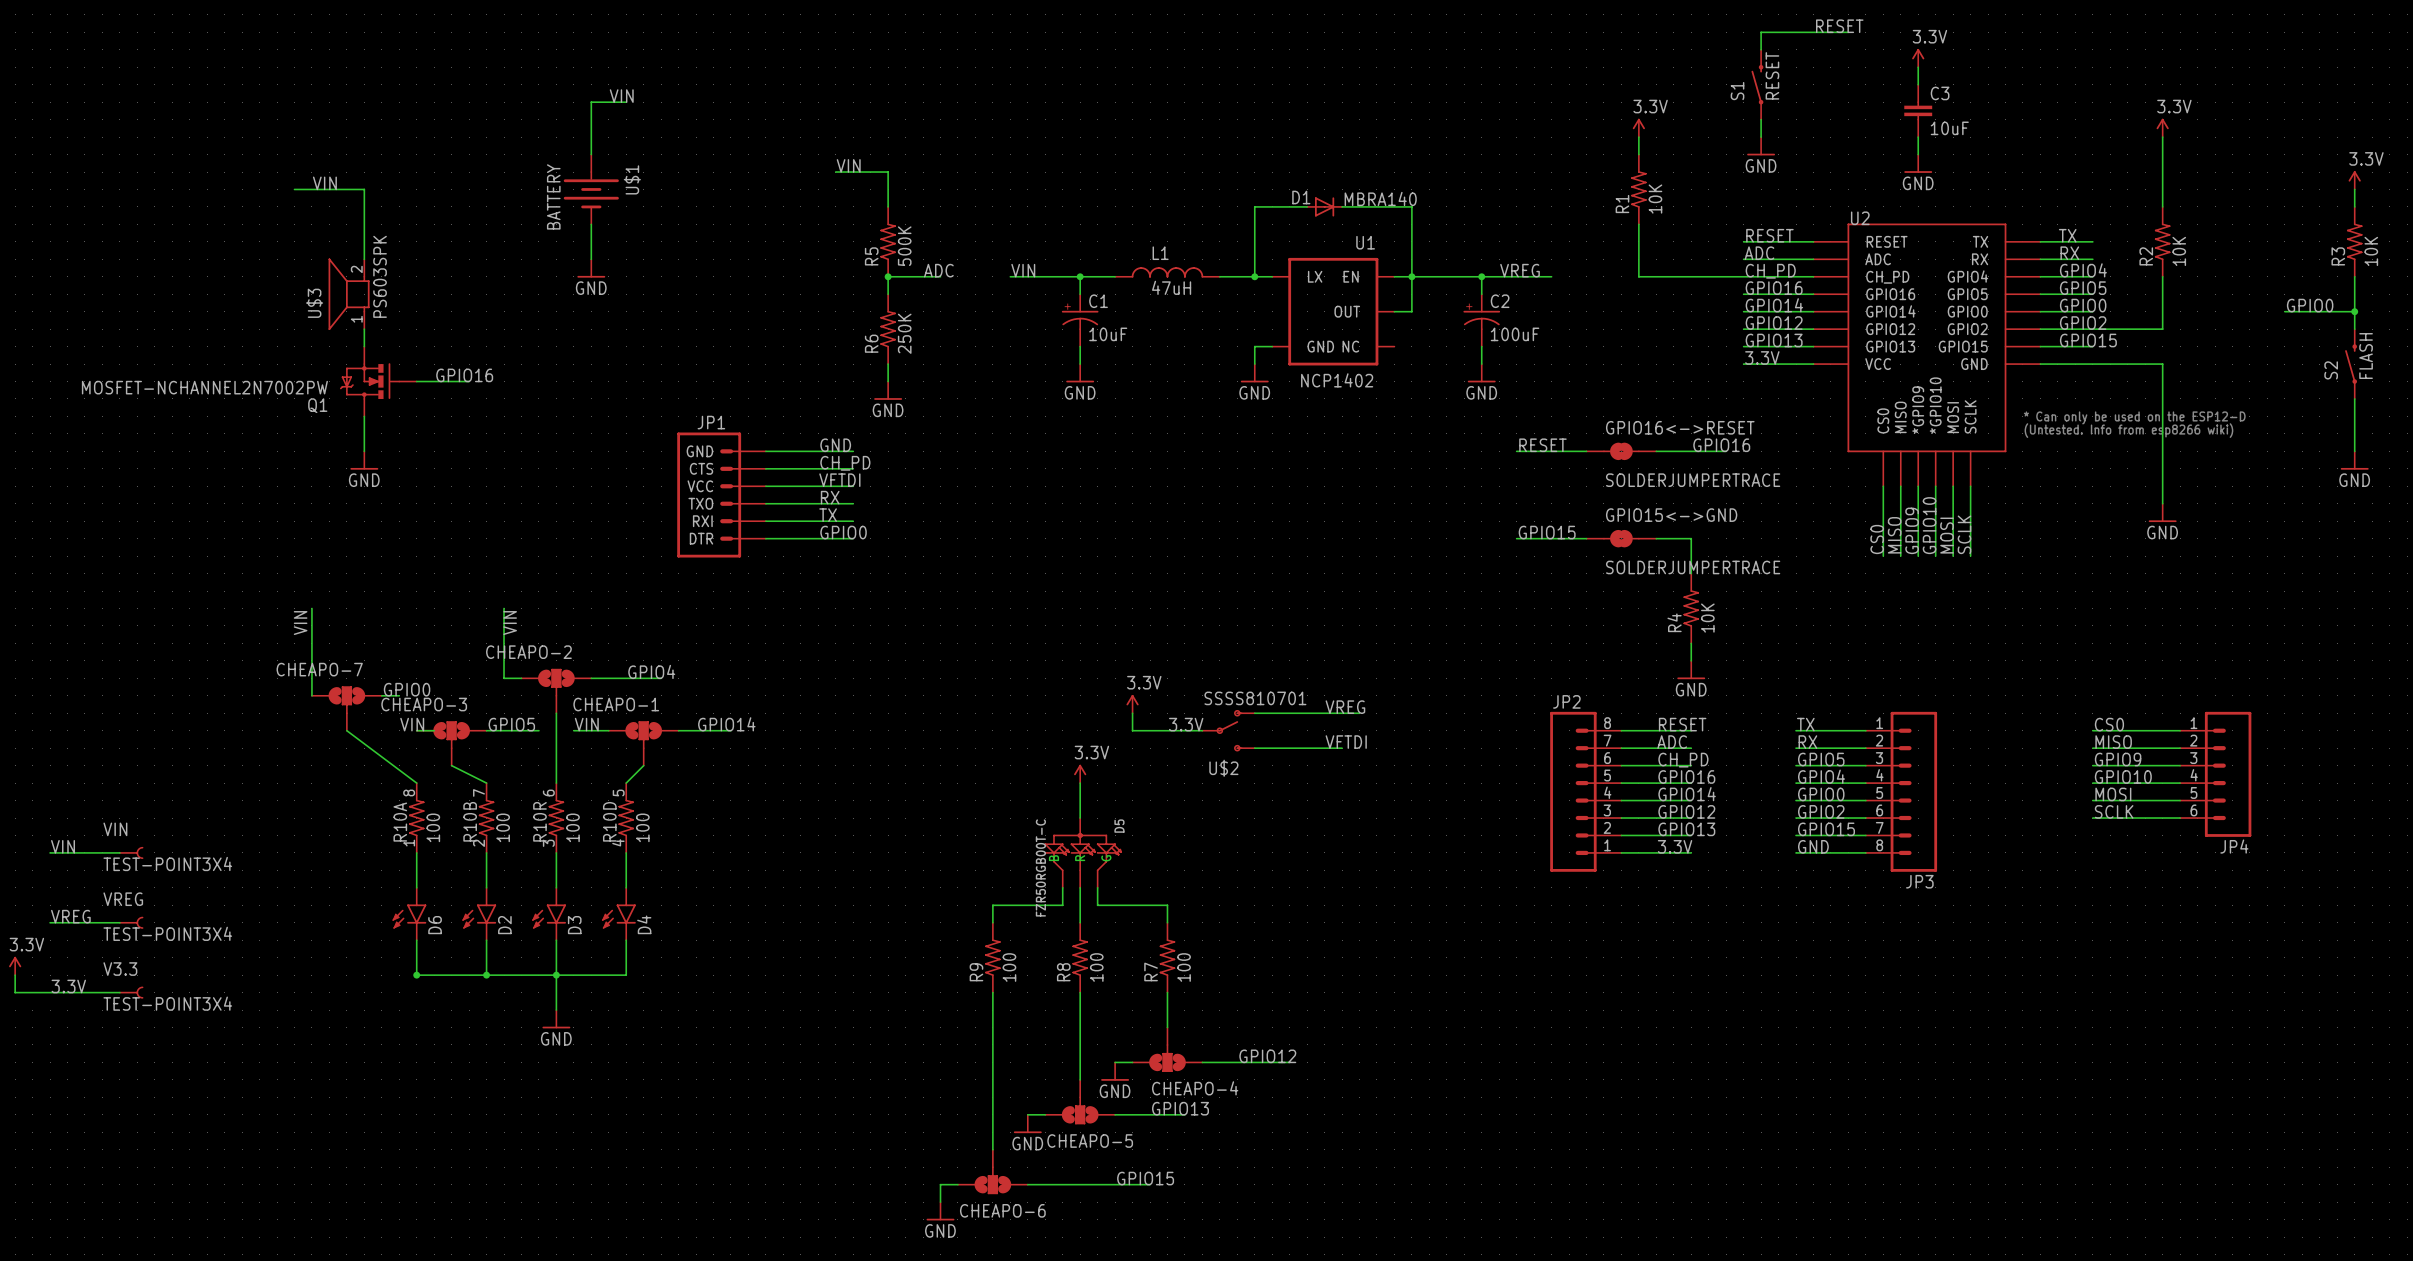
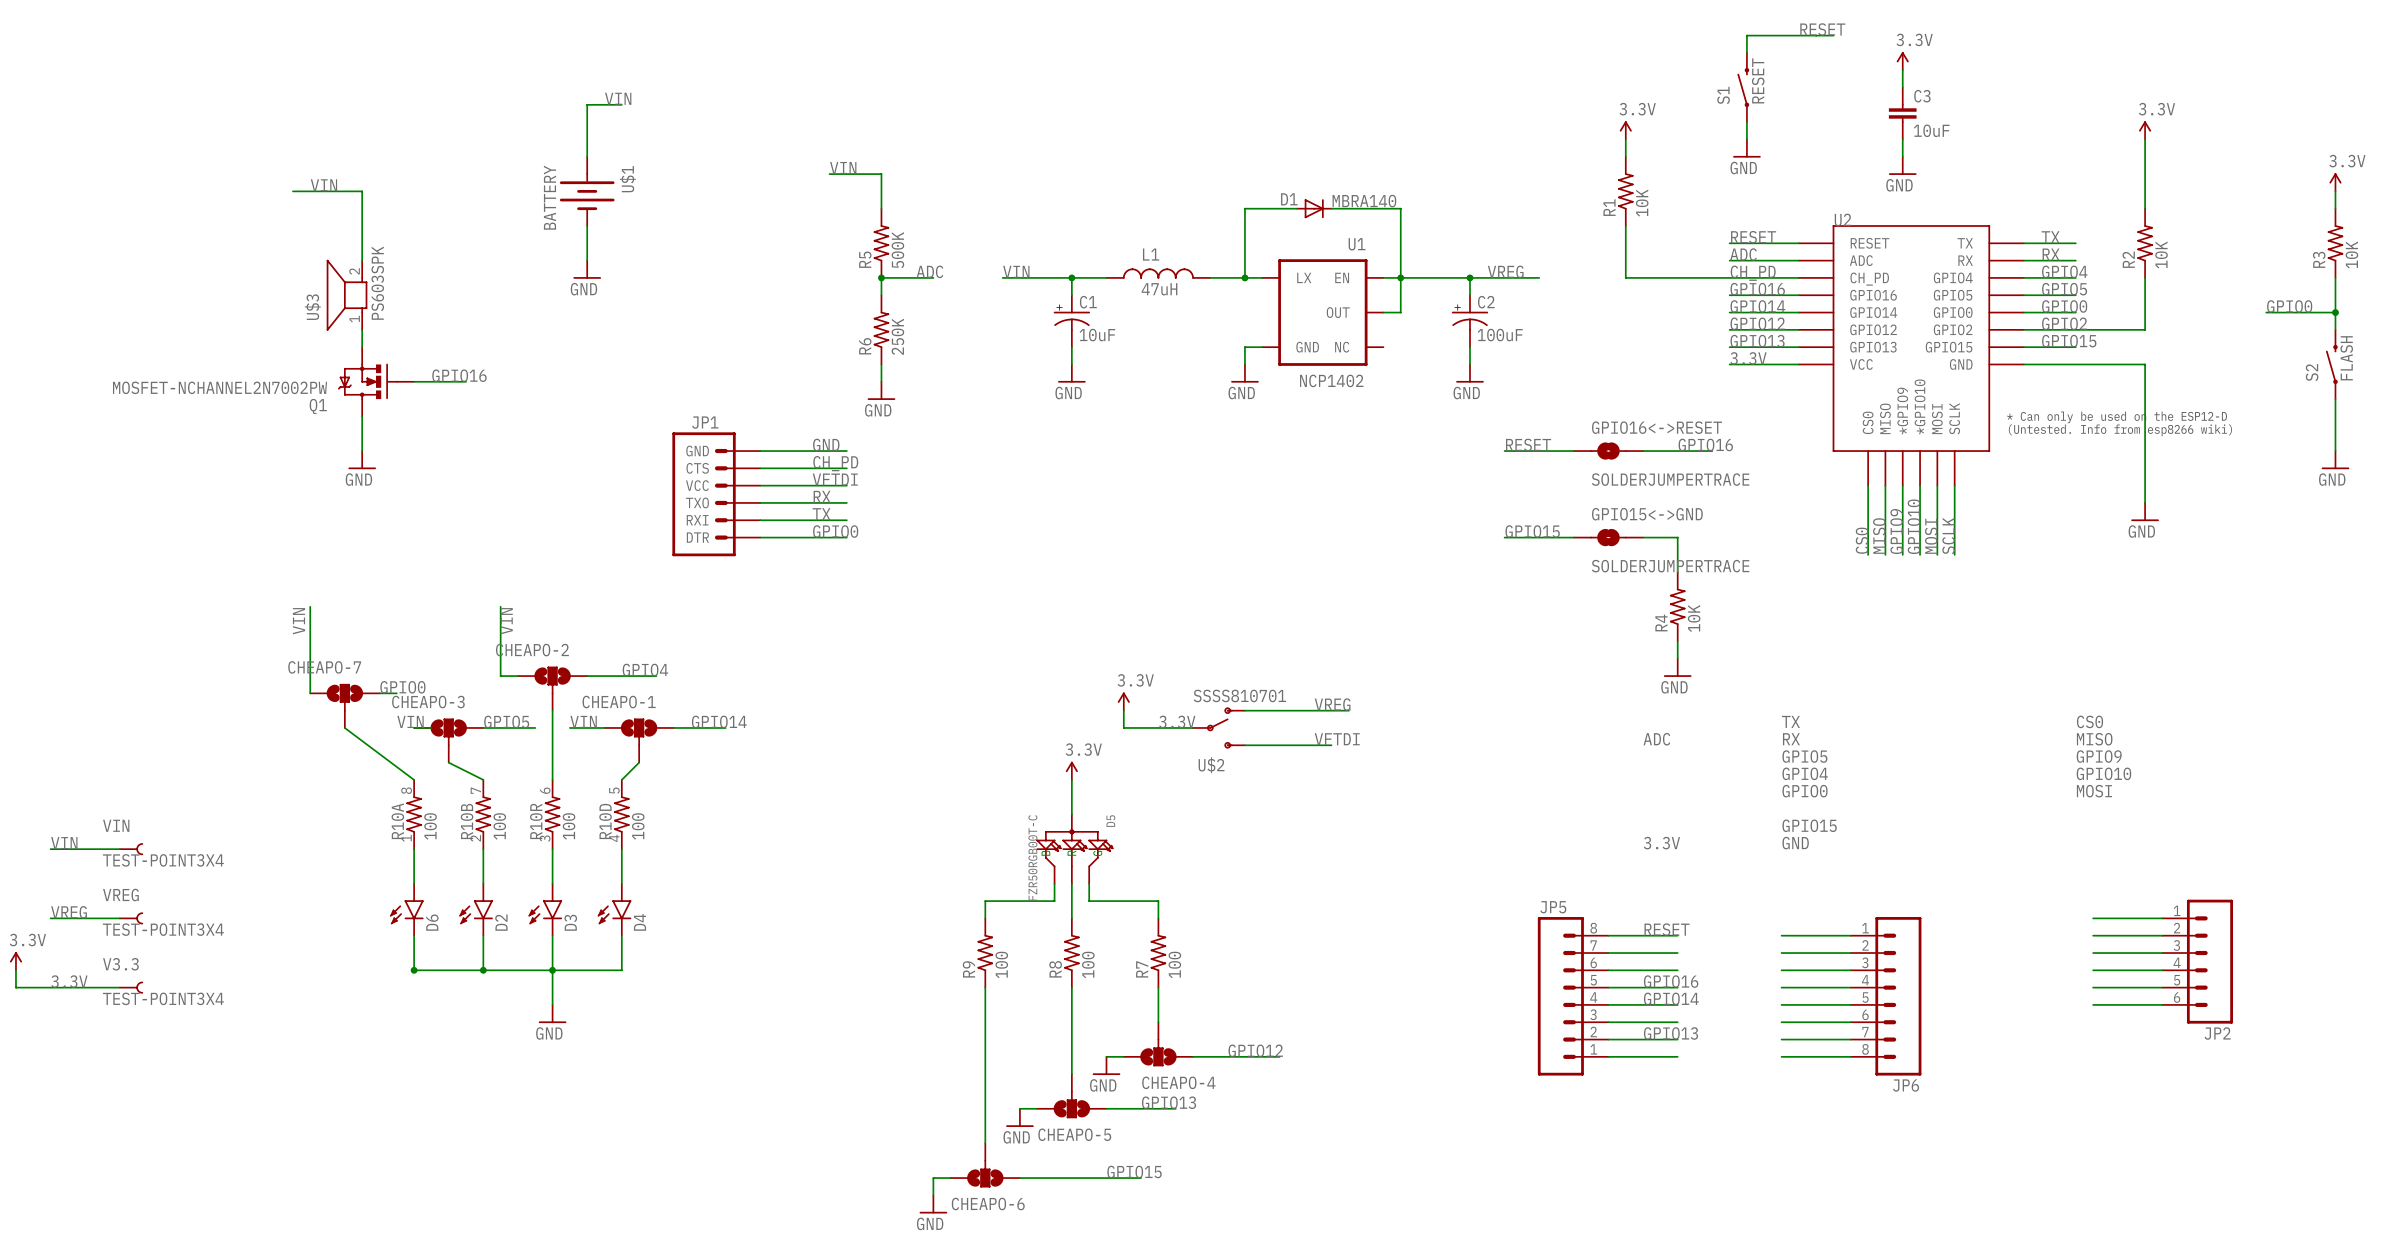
JP2 name position: JP2 (1566, 701) -> JP2 (2217, 1033)
JP2 symbol: [1550, 711, 1622, 872] -> [2162, 899, 2234, 1024]
label: RESET (1682, 724) -> none
wire: (1621, 730) (1691, 730) -> none
wire: (1796, 730) (1865, 730) -> none
wire: (2092, 730) (2180, 730) -> none
wire: (1621, 748) (1691, 748) -> none
wire: (1796, 748) (1865, 748) -> none
wire: (2092, 748) (2180, 748) -> none
label: CH_PD (1683, 760) -> none
wire: (1621, 765) (1691, 765) -> none
wire: (1796, 765) (1865, 765) -> none
wire: (2092, 765) (2180, 765) -> none
JP4: (2215, 774) -> none
label: GPIO16 (1686, 776) -> none
wire: (1621, 783) (1691, 783) -> (1608, 935) (1677, 935)
wire: (1796, 783) (1865, 783) -> (1781, 935) (1850, 935)
wire: (2092, 783) (2180, 783) -> none
JP3: (1901, 791) -> none
label: GPIO14 (1687, 794) -> none
wire: (1621, 800) (1691, 800) -> (1608, 953) (1677, 953)
wire: (1796, 800) (1865, 800) -> (1781, 953) (1850, 953)
wire: (2092, 800) (2180, 800) -> none
label: GPIO12 (1686, 811) -> none
label: GPIO2 (1821, 811) -> none
label: SCLK (2114, 811) -> none
wire: (1621, 818) (1691, 818) -> (1608, 970) (1677, 970)
wire: (1796, 818) (1865, 818) -> (1781, 970) (1850, 970)
wire: (2092, 818) (2180, 818) -> none
label: GPIO13 (1686, 829) -> none
wire: (1621, 835) (1691, 835) -> (1608, 987) (1677, 987)
wire: (1796, 835) (1865, 835) -> (1781, 987) (1850, 987)
wire: (1621, 852) (1691, 852) -> (1608, 1004) (1677, 1004)
wire: (1796, 852) (1865, 852) -> (1781, 1004) (1850, 1004)
wire: none -> (2093, 918) (2162, 918)
label: none -> RESET (1667, 929)
wire: none -> (2093, 935) (2162, 935)
wire: none -> (2093, 953) (2162, 953)
wire: none -> (2093, 970) (2162, 970)
label: none -> GPIO16 (1671, 981)
wire: none -> (2093, 987) (2162, 987)
JP5: none -> (1573, 996)
JP6: none -> (1886, 996)
label: none -> GPIO14 (1671, 998)
wire: none -> (2093, 1004) (2162, 1004)
wire: none -> (1608, 1022) (1677, 1022)
wire: none -> (1781, 1022) (1850, 1022)
label: none -> GPIO13 (1671, 1033)
wire: none -> (1608, 1039) (1677, 1039)
wire: none -> (1781, 1039) (1850, 1039)
wire: none -> (1608, 1056) (1677, 1056)
wire: none -> (1781, 1056) (1850, 1056)

